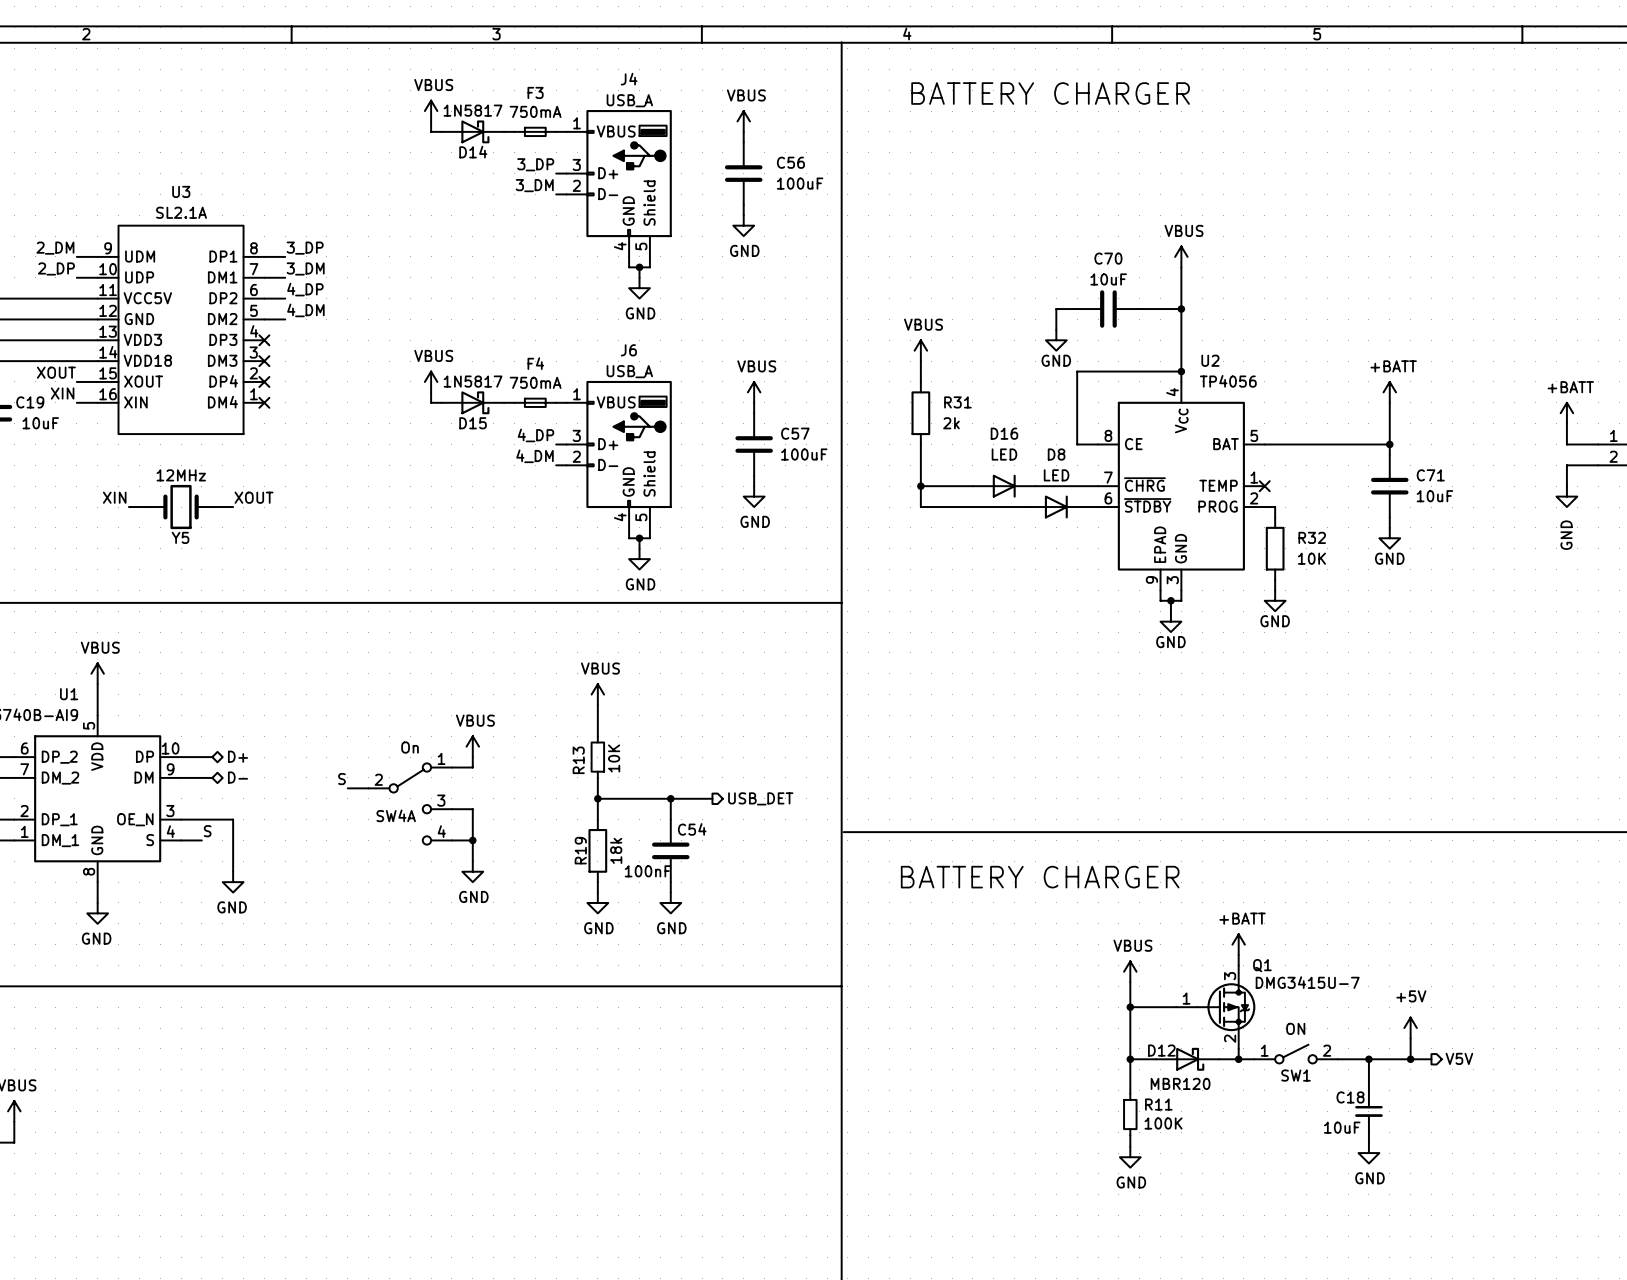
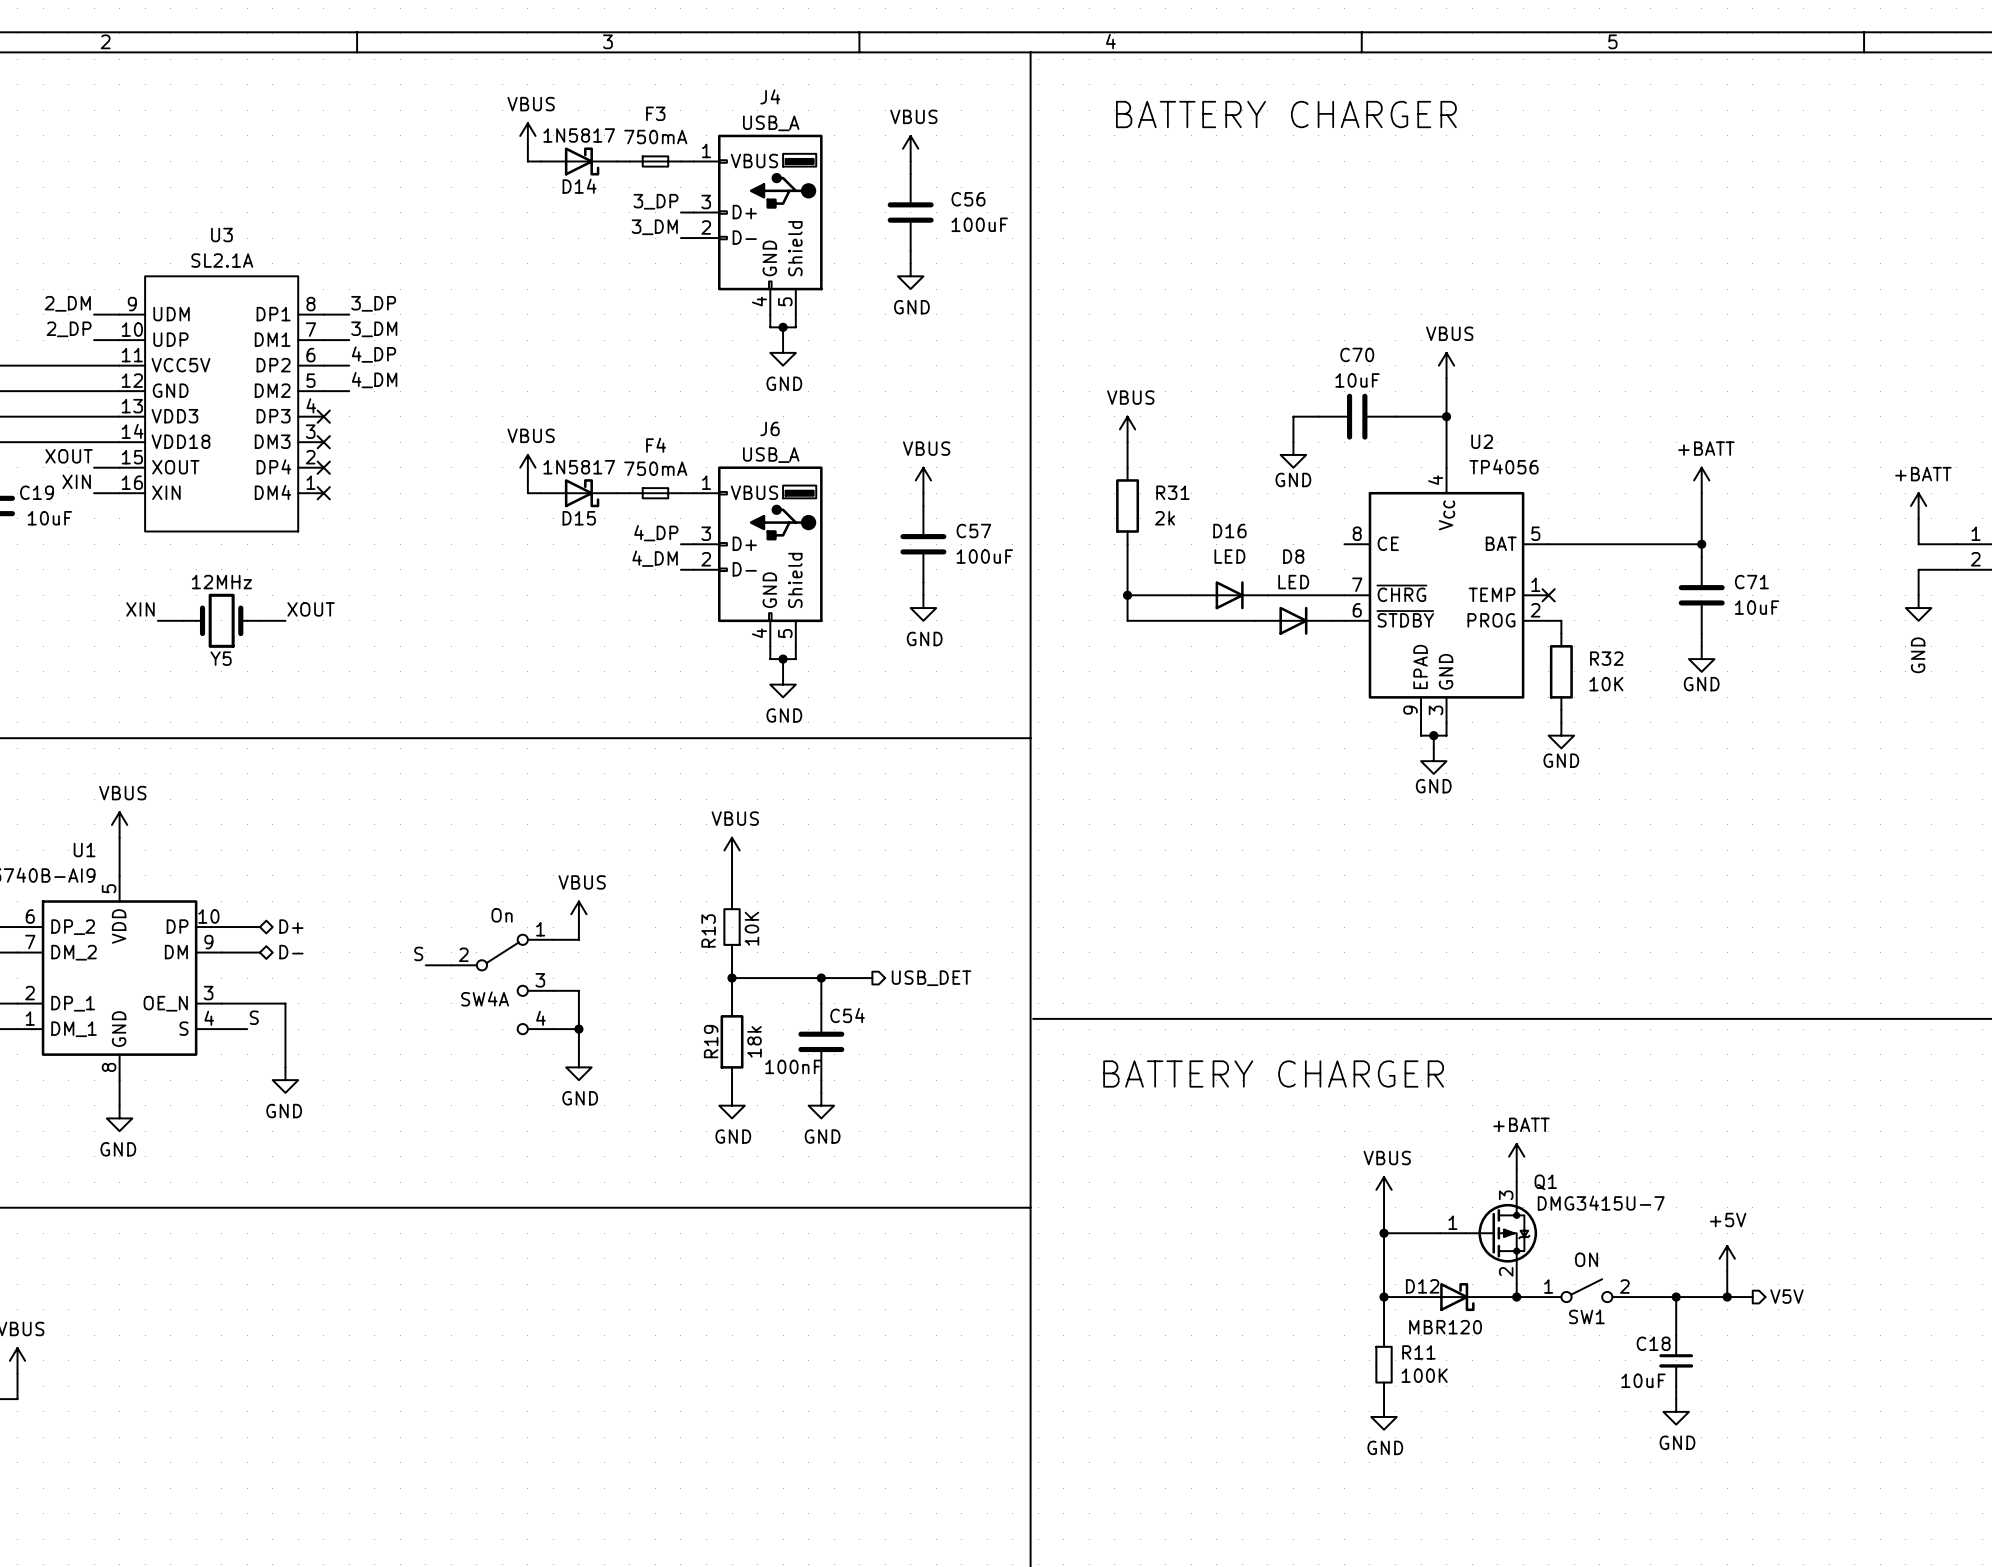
power symbol position: VBUS (1181, 256) -> VBUS (1446, 365)
wire: (1181, 267) (1181, 309) (1139, 309) -> none
wire: (1077, 309) (1056, 309) (1056, 329) -> (1318, 416) (1293, 416) (1293, 442)
C70 position: (1108, 309) -> (1357, 416)
junction: (1181, 309) -> none
power symbol position: GND (1056, 340) -> GND (1293, 454)
wire: none -> (1395, 416) (1446, 416)
junction: none -> (1446, 416)
wire: (1181, 371) (1077, 371) (1077, 444) (1098, 444) -> none
junction: (1181, 371) -> none

